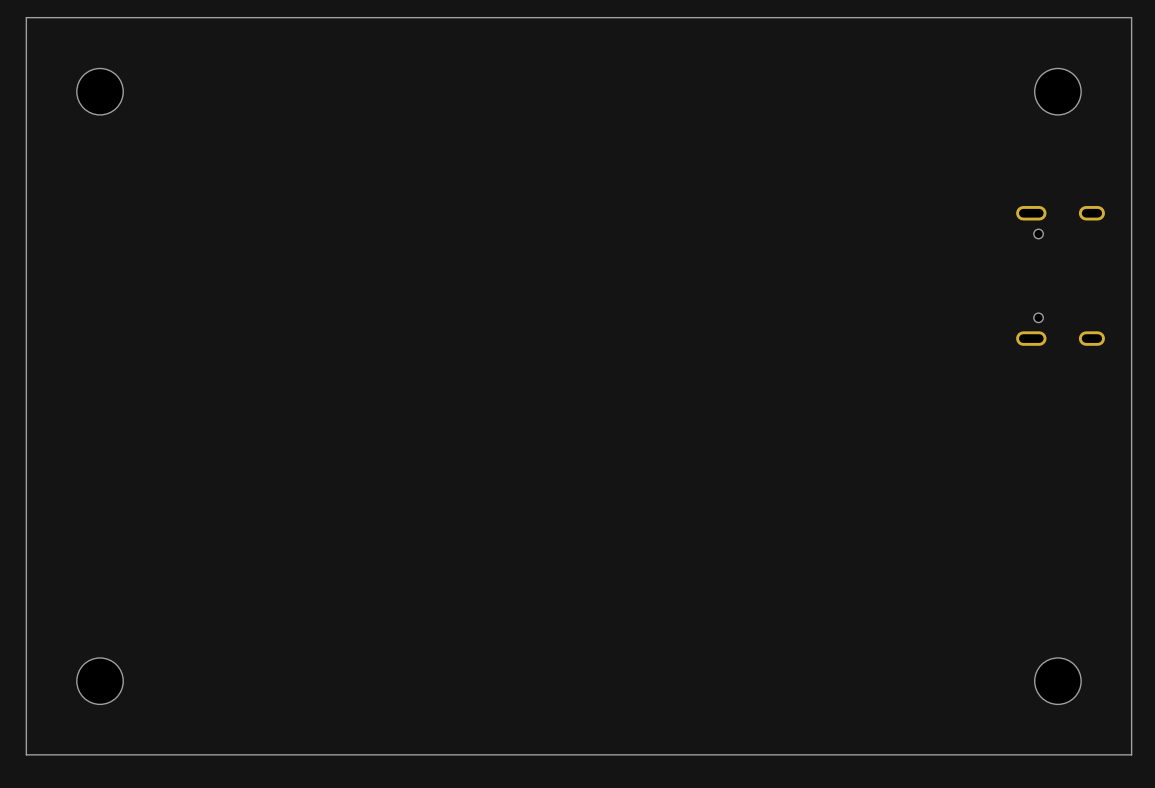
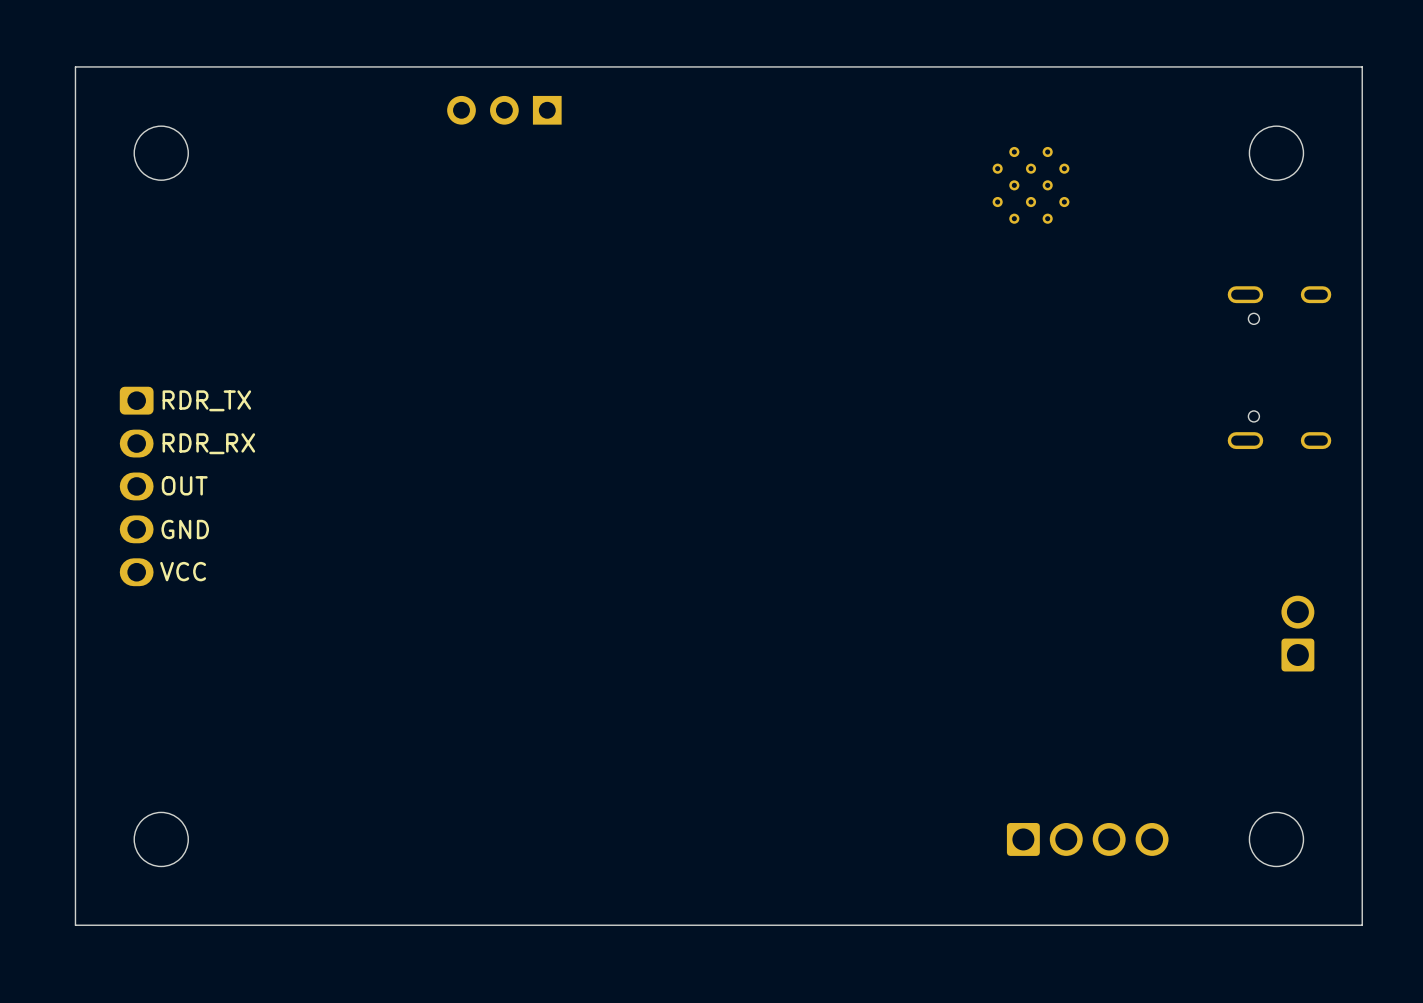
part: none -> (504, 110)
part: none -> (1031, 185)
part: none -> (136, 486)
part: none -> (1297, 633)
part: none -> (1087, 839)

